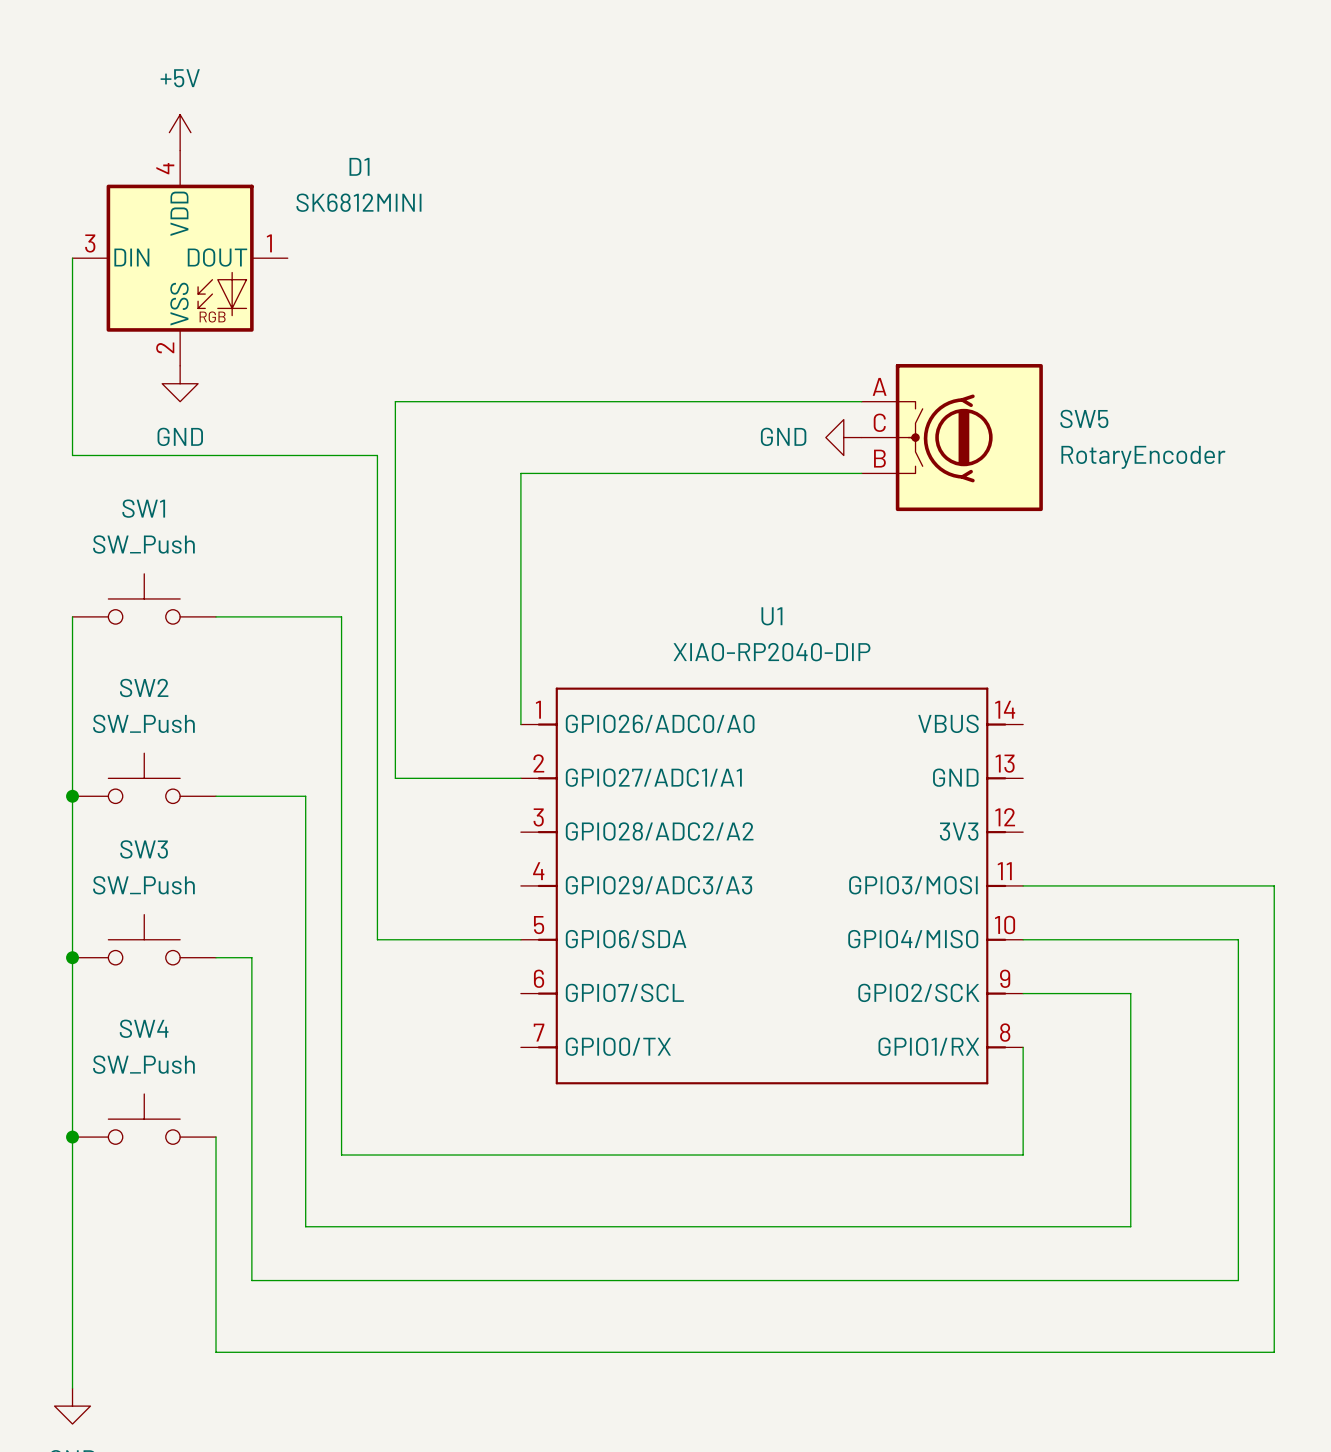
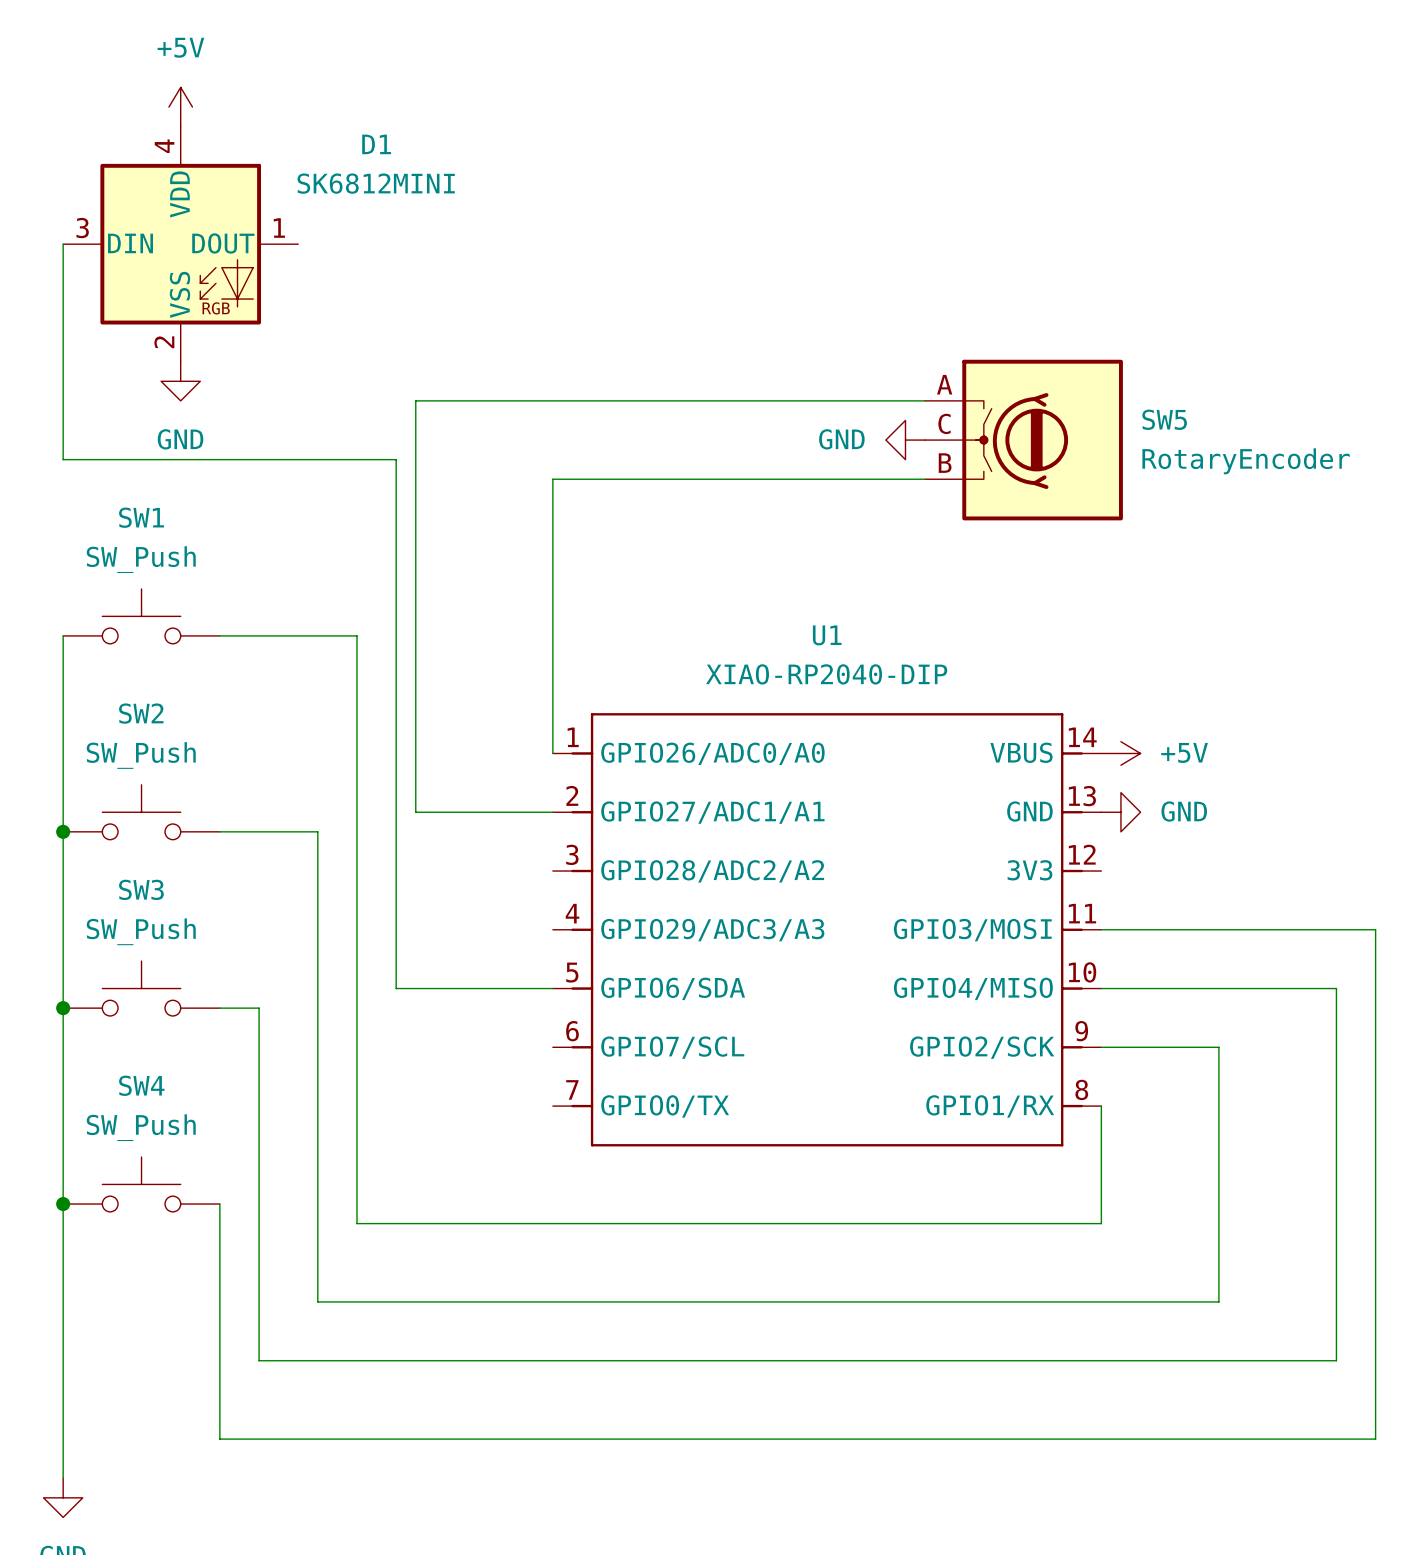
power symbol: none -> +5V (1120, 753)
power symbol: none -> GND (1120, 812)

